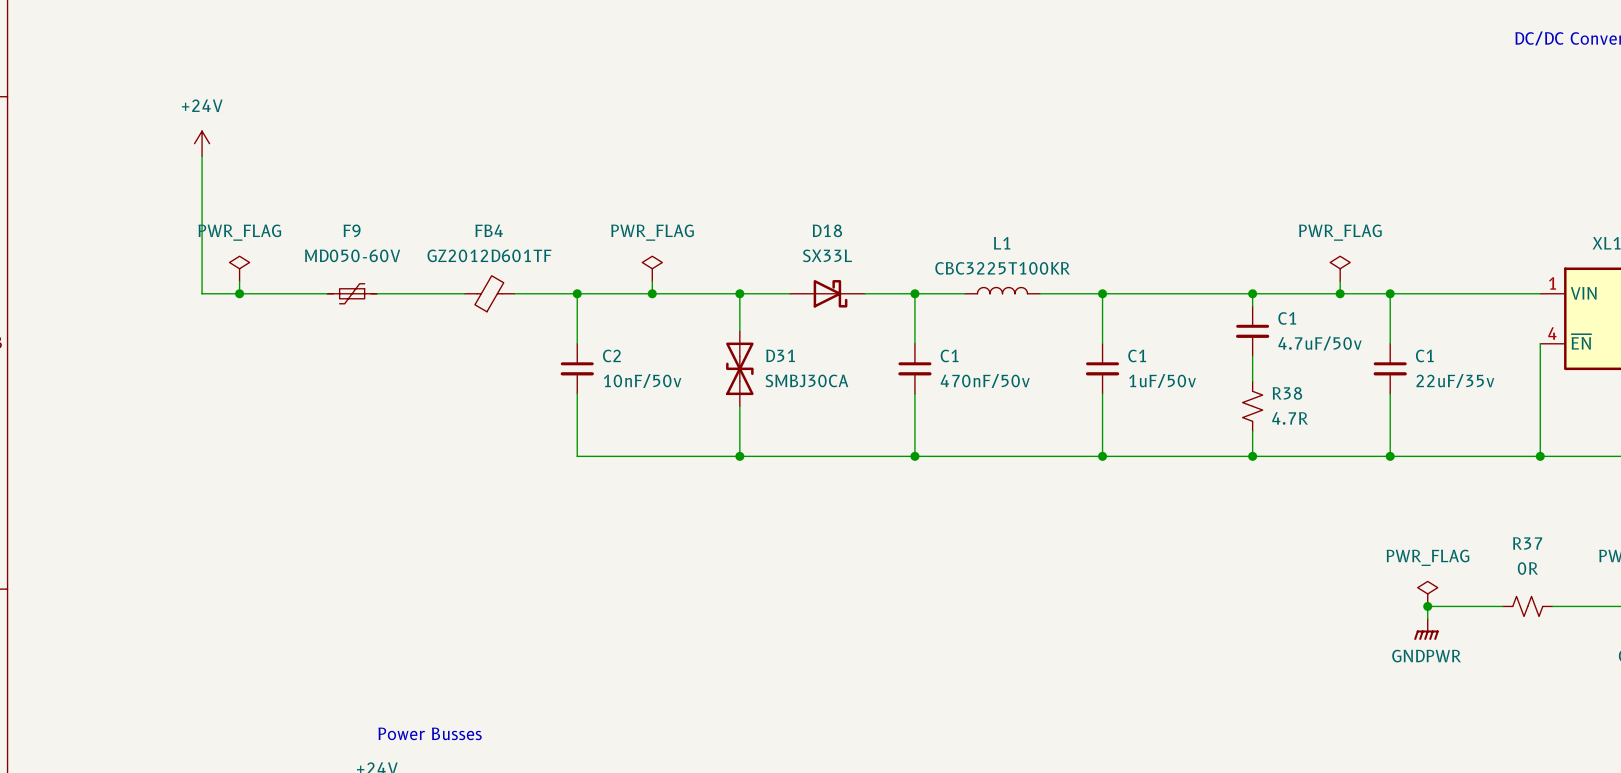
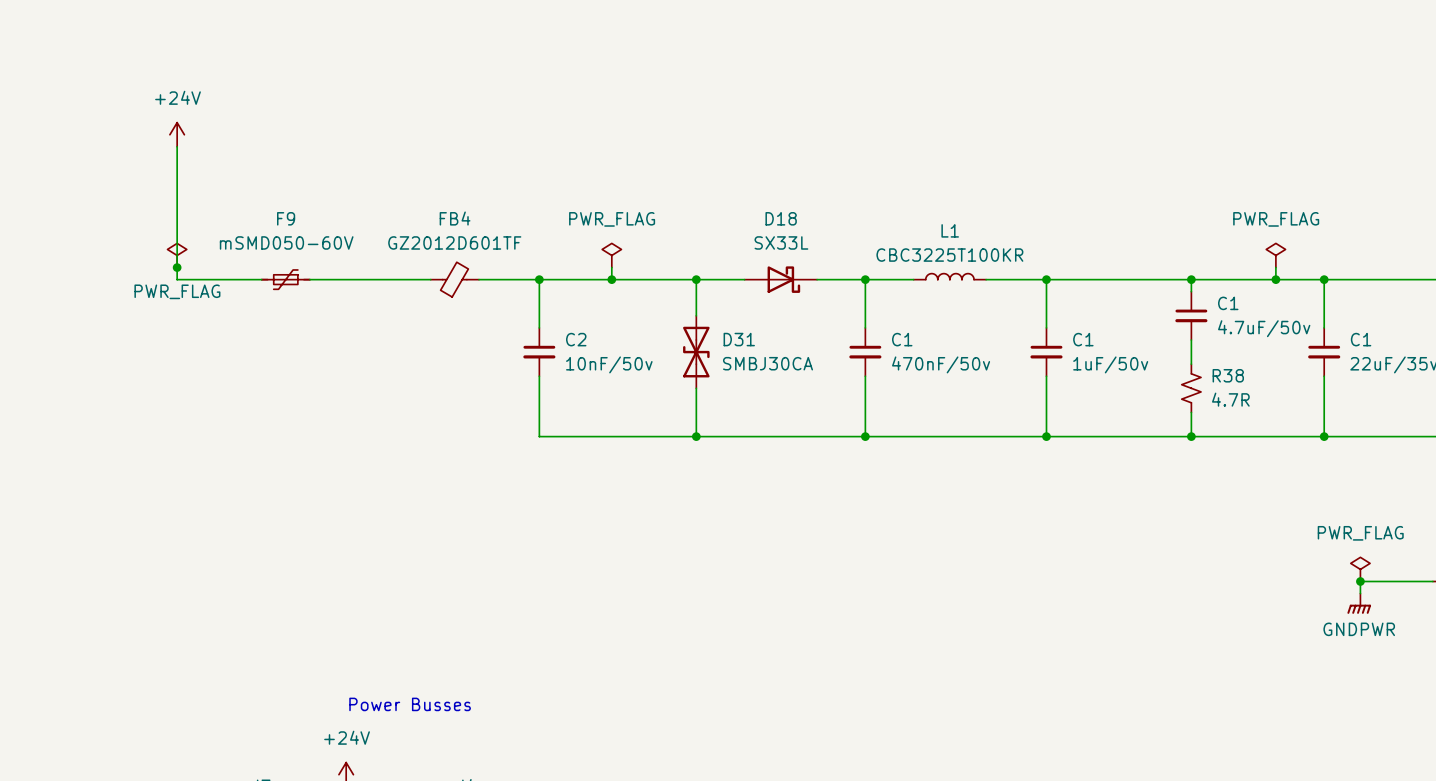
power symbol text position: PWR_FLAG (239, 232) -> PWR_FLAG (177, 291)
F9 value: MD050-60V (352, 255) -> mSMD050-60V (286, 242)
power symbol position: PWR_FLAG (239, 268) -> PWR_FLAG (177, 255)
wire: (239, 281) (239, 293) -> none
junction position: (239, 293) -> (177, 267)
F9 position: (352, 293) -> (285, 279)

